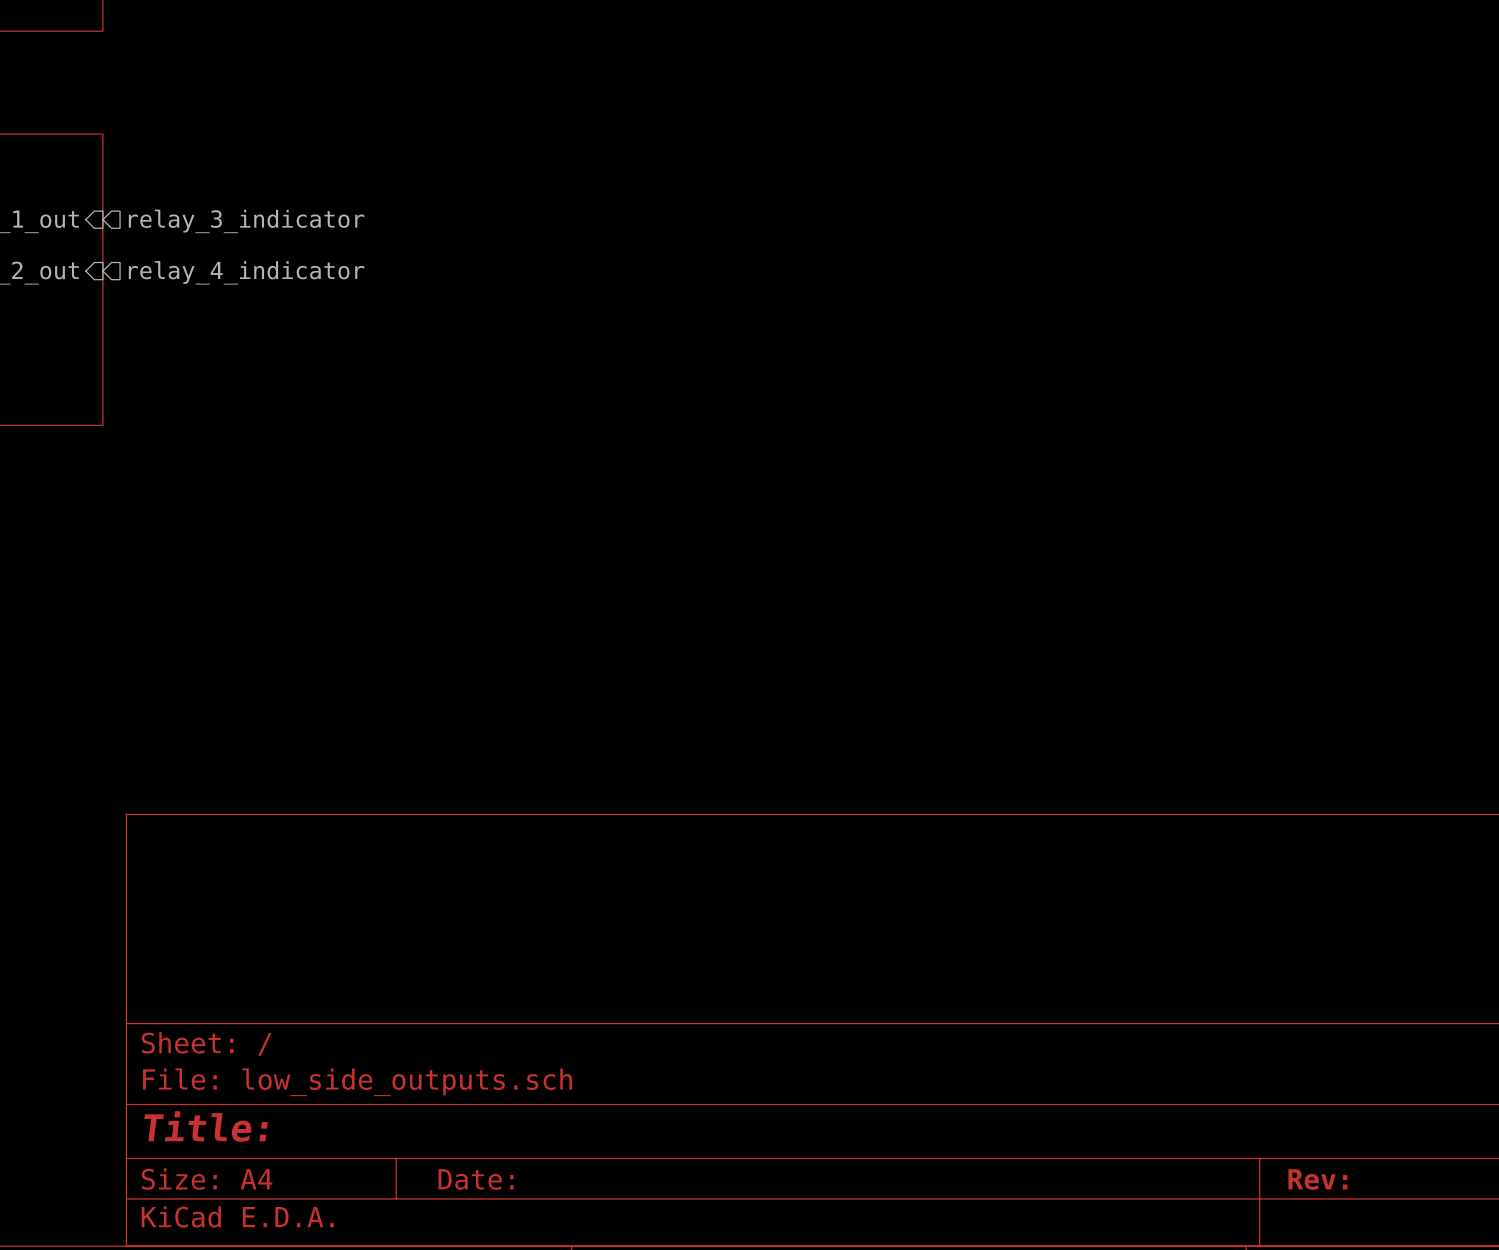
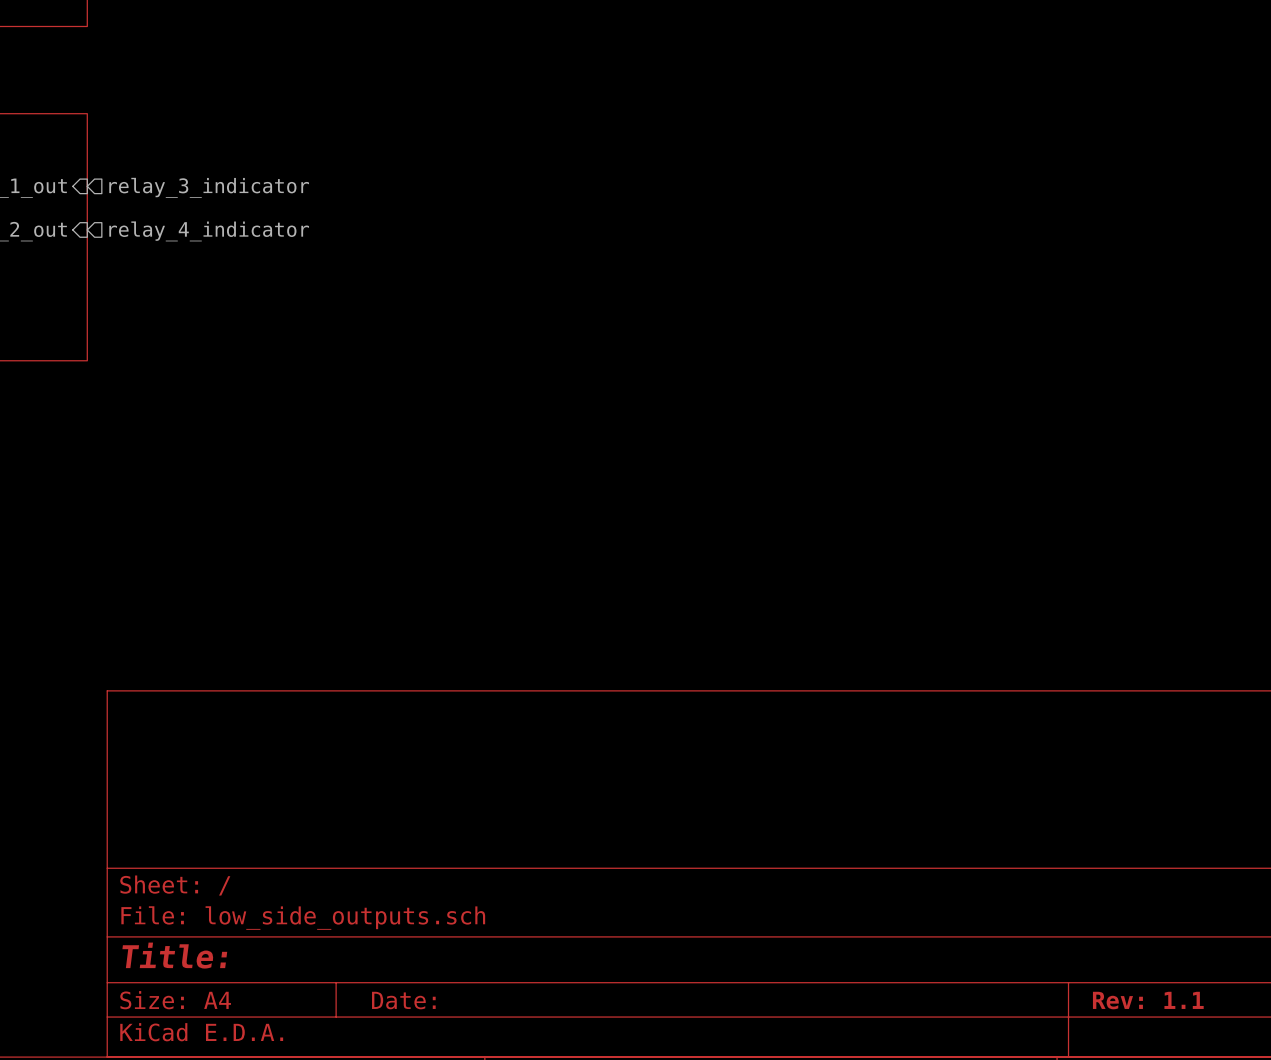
title block: Rev: (1317, 1179) -> Rev: 1.1 (1148, 1000)

